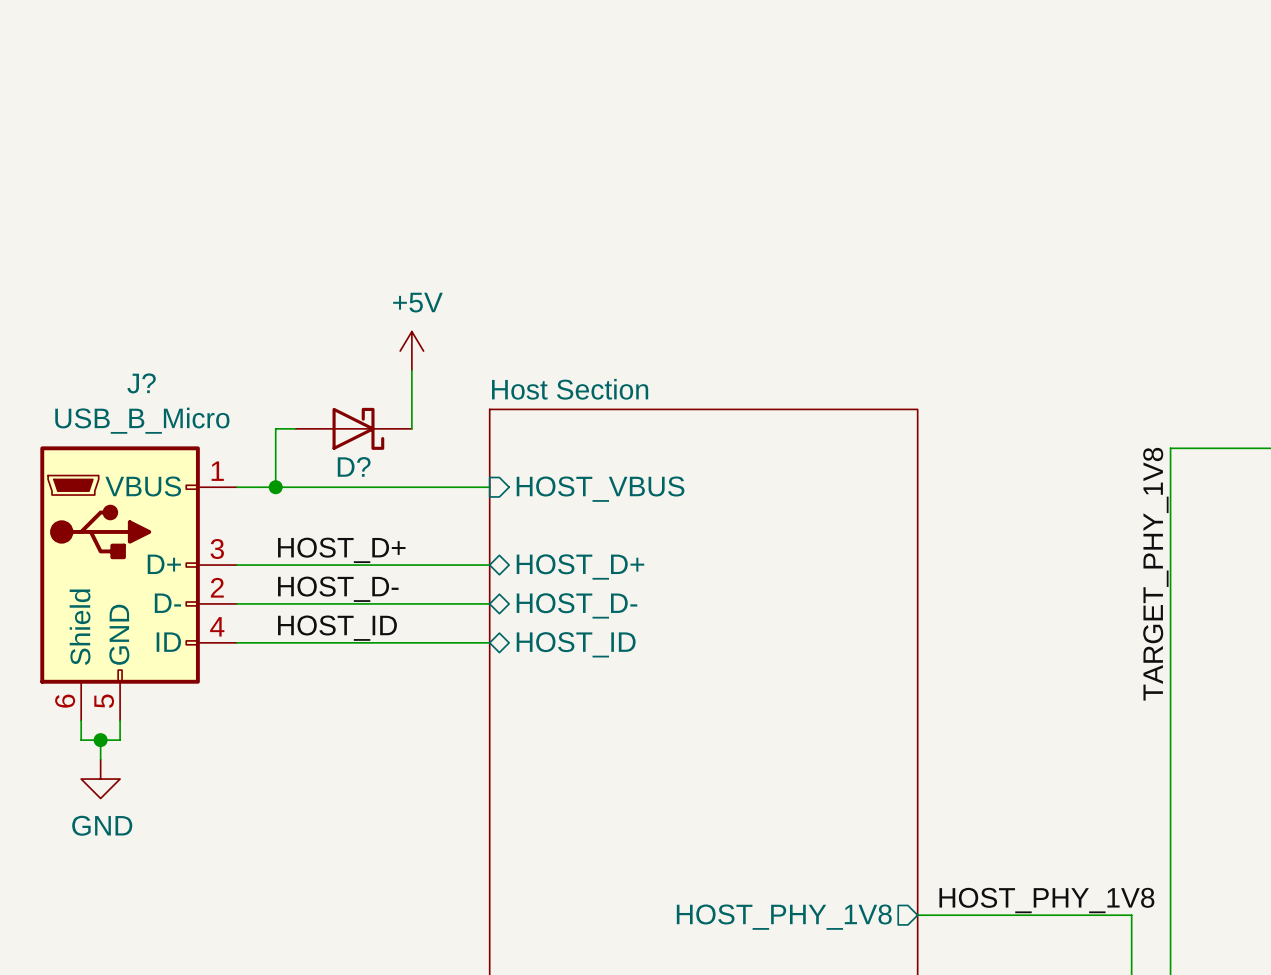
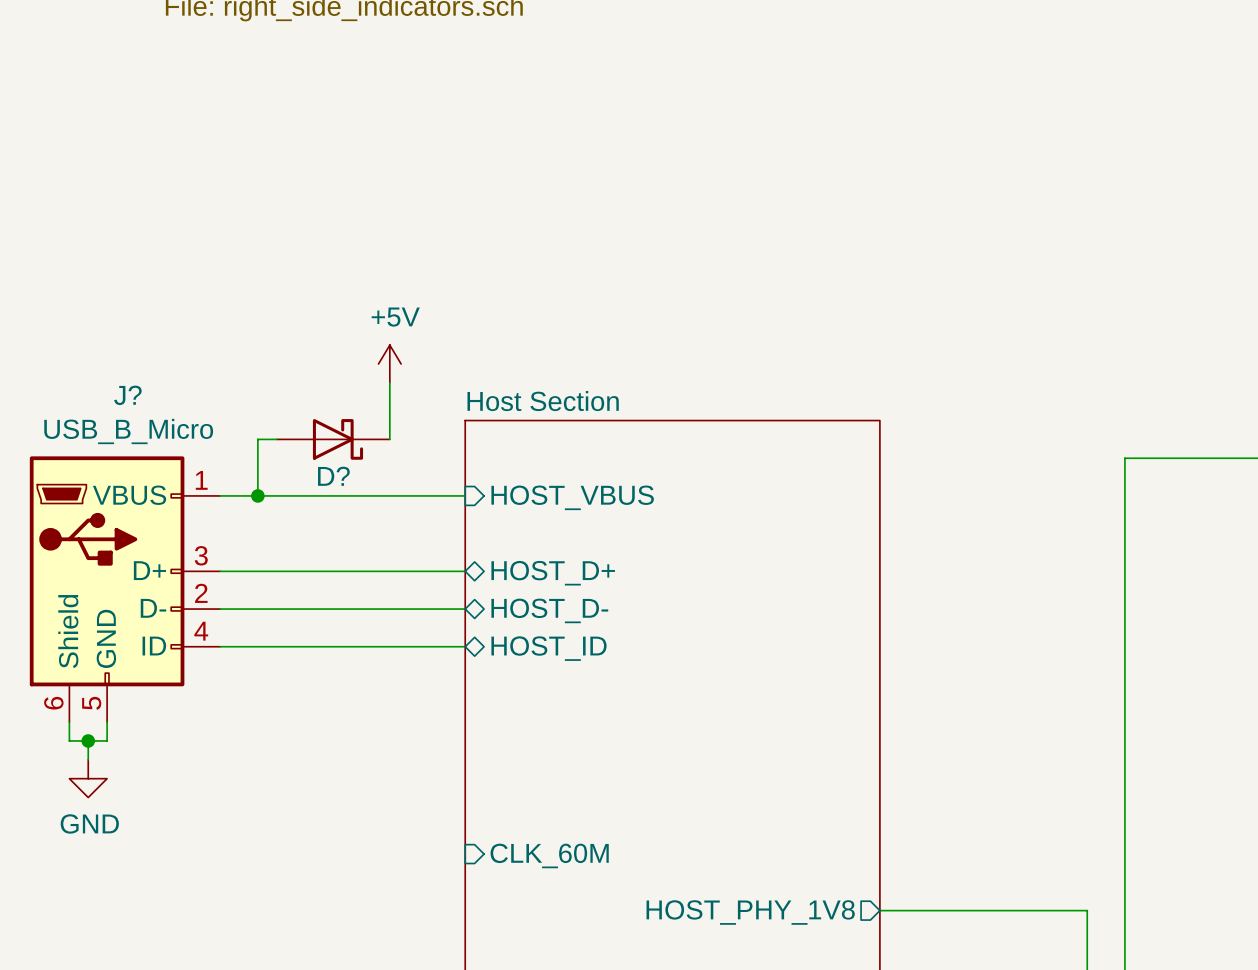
label: HOST_D+ (341, 550) -> none
label: TARGET_PHY_1V8 (1155, 574) -> none
label: HOST_D- (338, 589) -> none
label: HOST_ID (337, 628) -> none
sheet pin: none -> CLK_60M (549, 855)
label: HOST_PHY_1V8 (1046, 900) -> none

